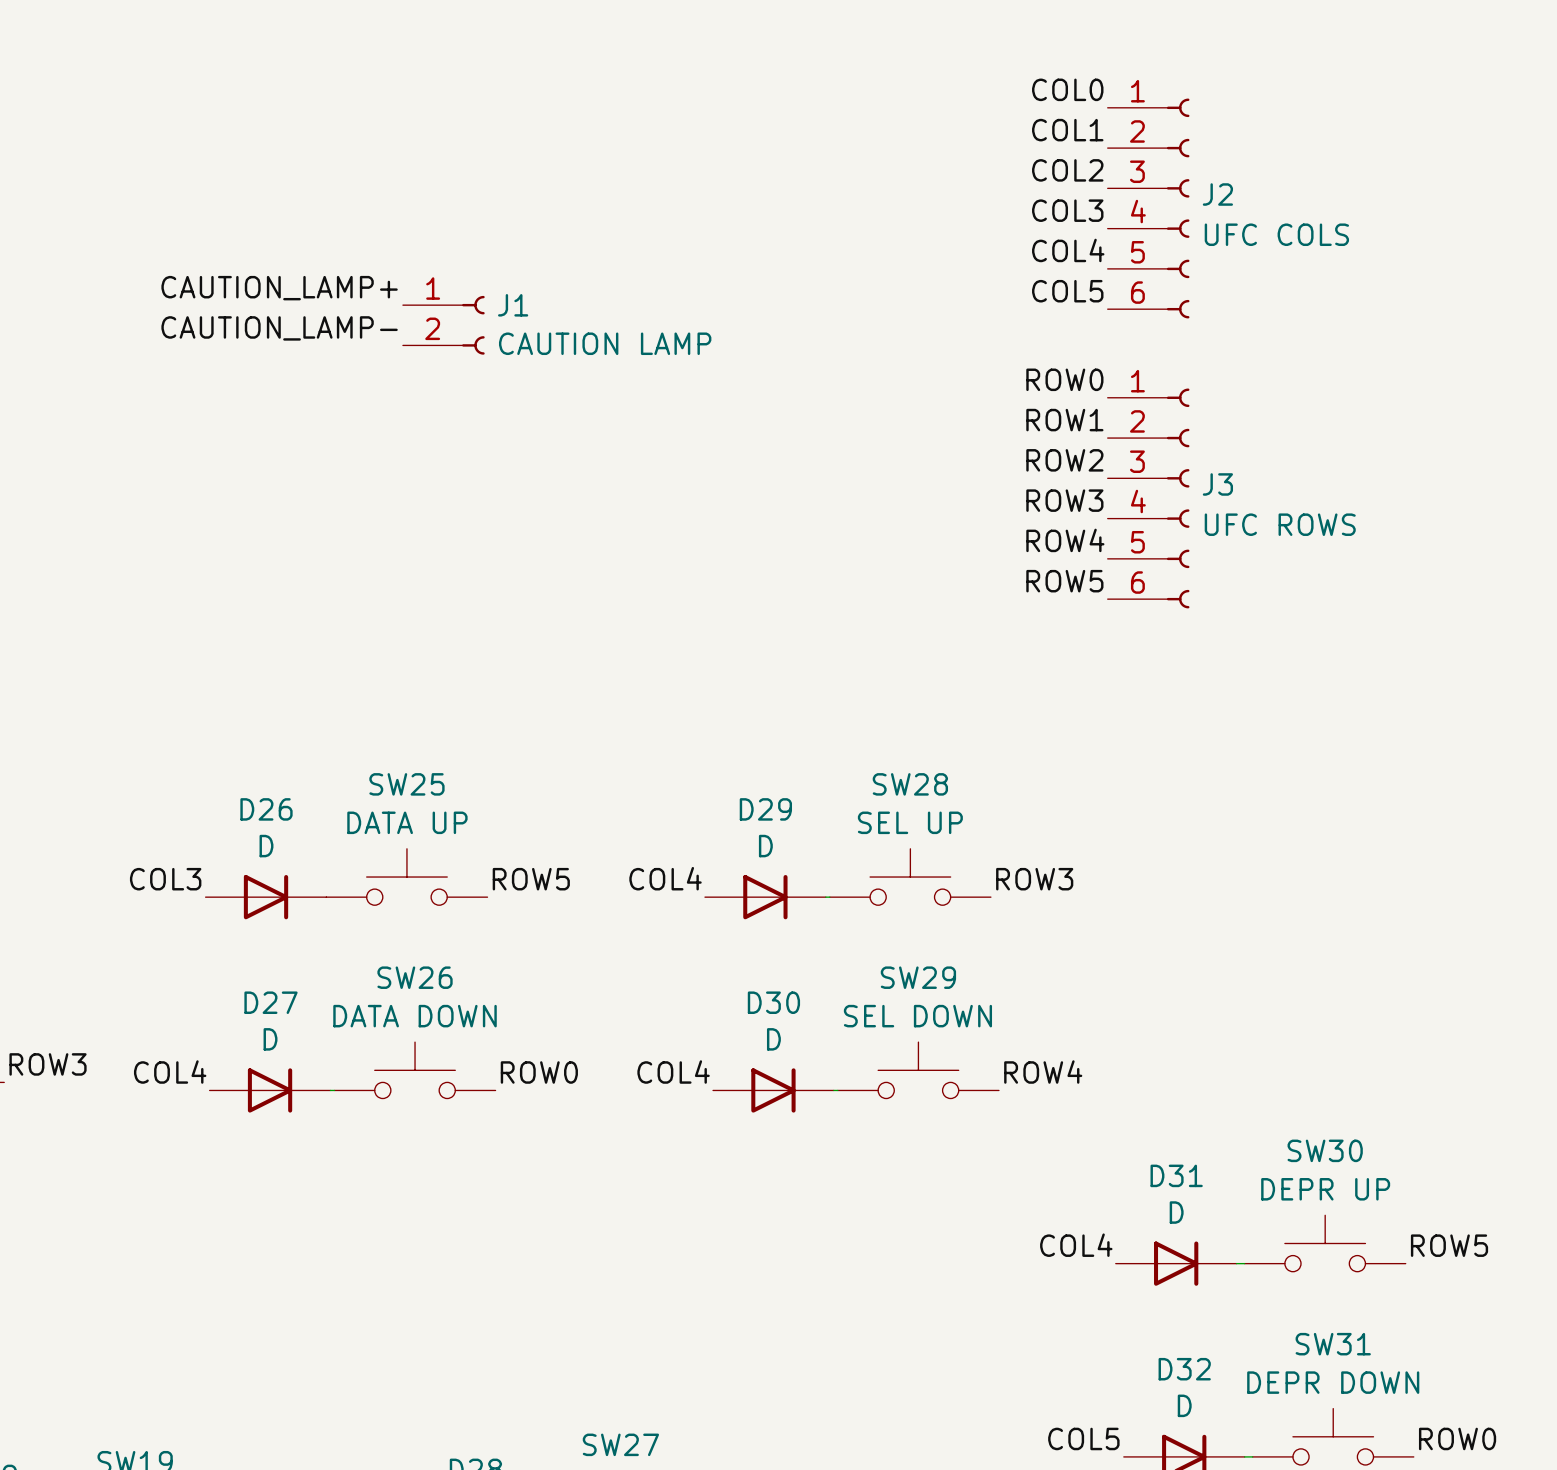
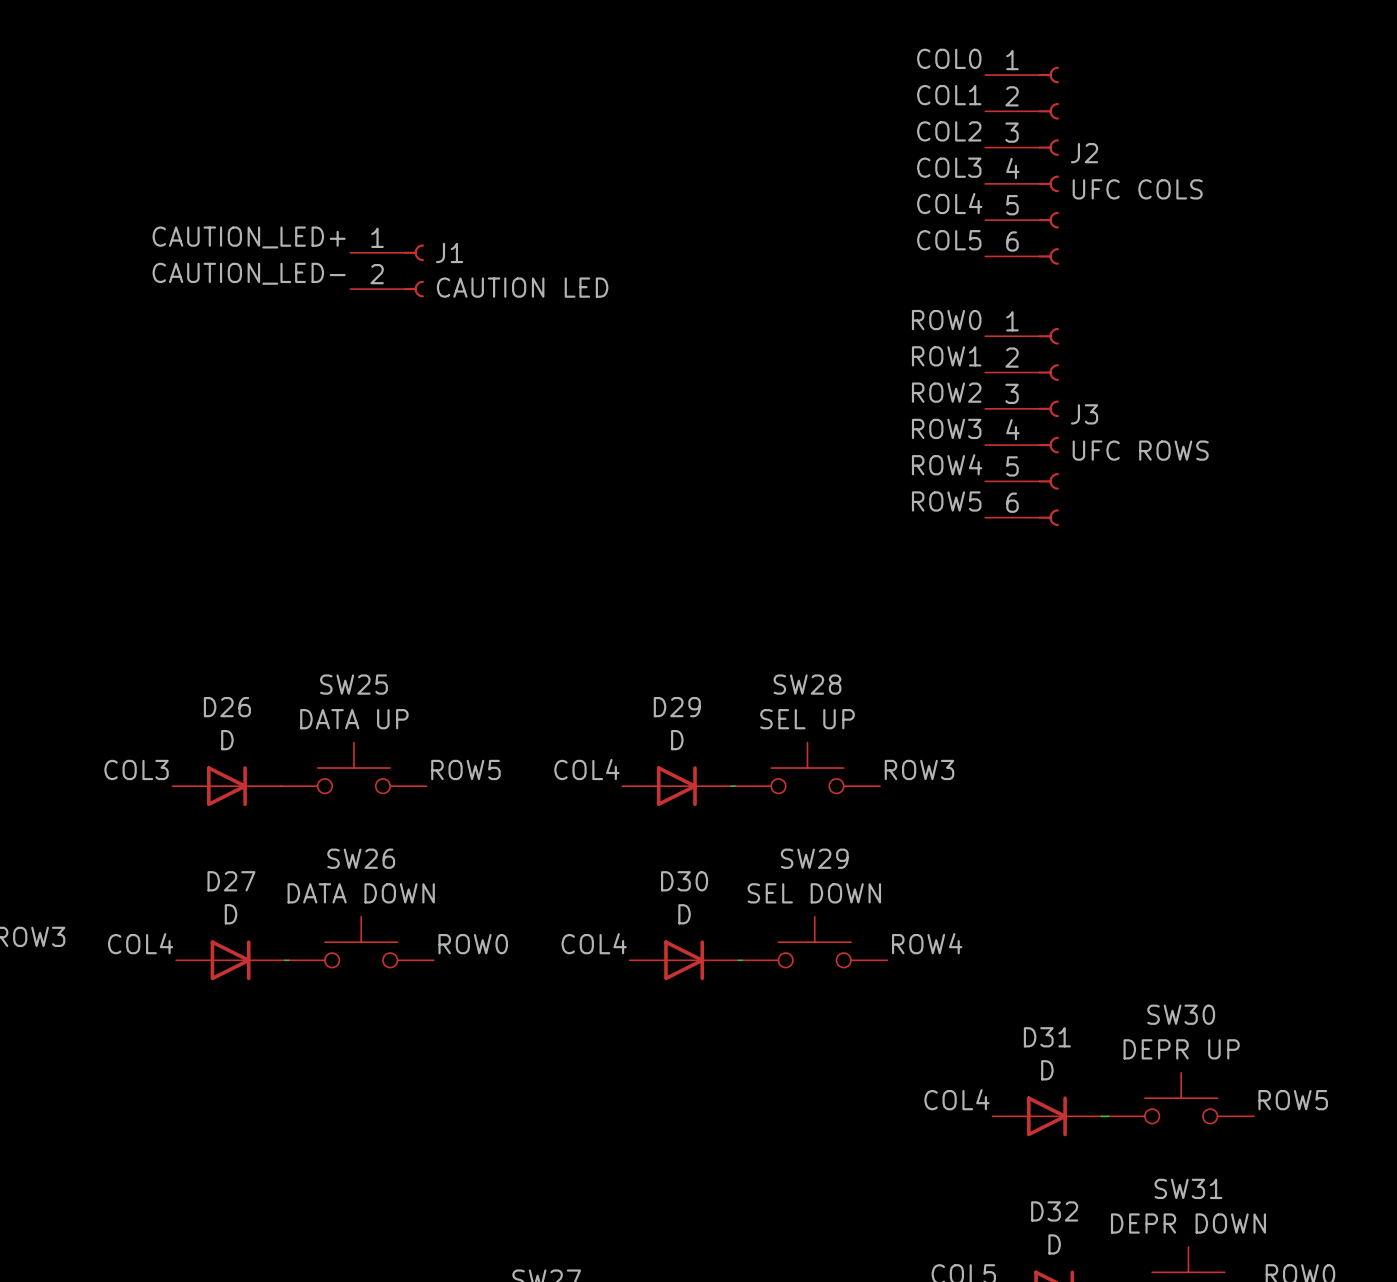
label: CAUTION_LAMP+ (279, 288) -> CAUTION_LED+ (249, 237)
label: CAUTION_LAMP- (279, 328) -> CAUTION_LED- (249, 273)
J1 value: CAUTION LAMP (605, 343) -> CAUTION LED (522, 287)

